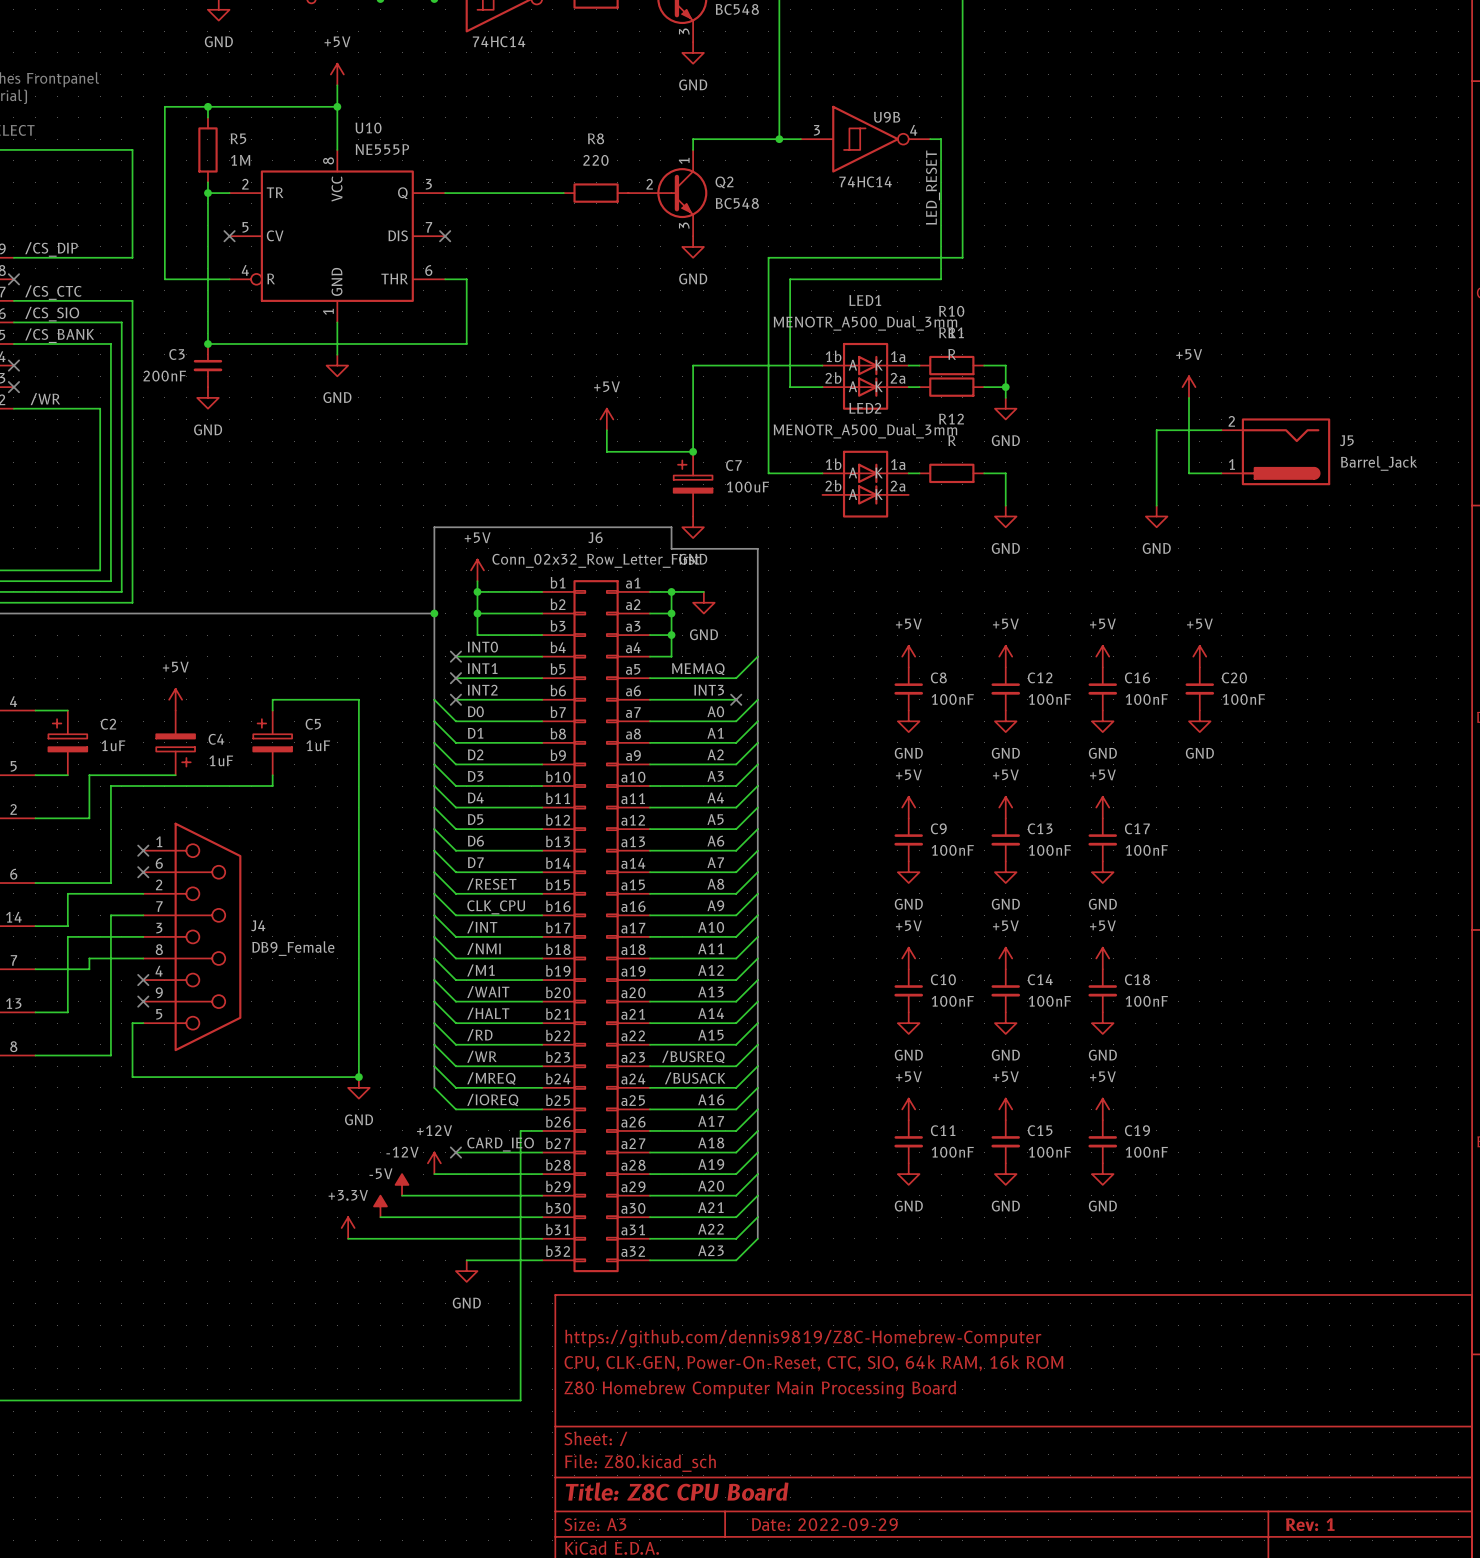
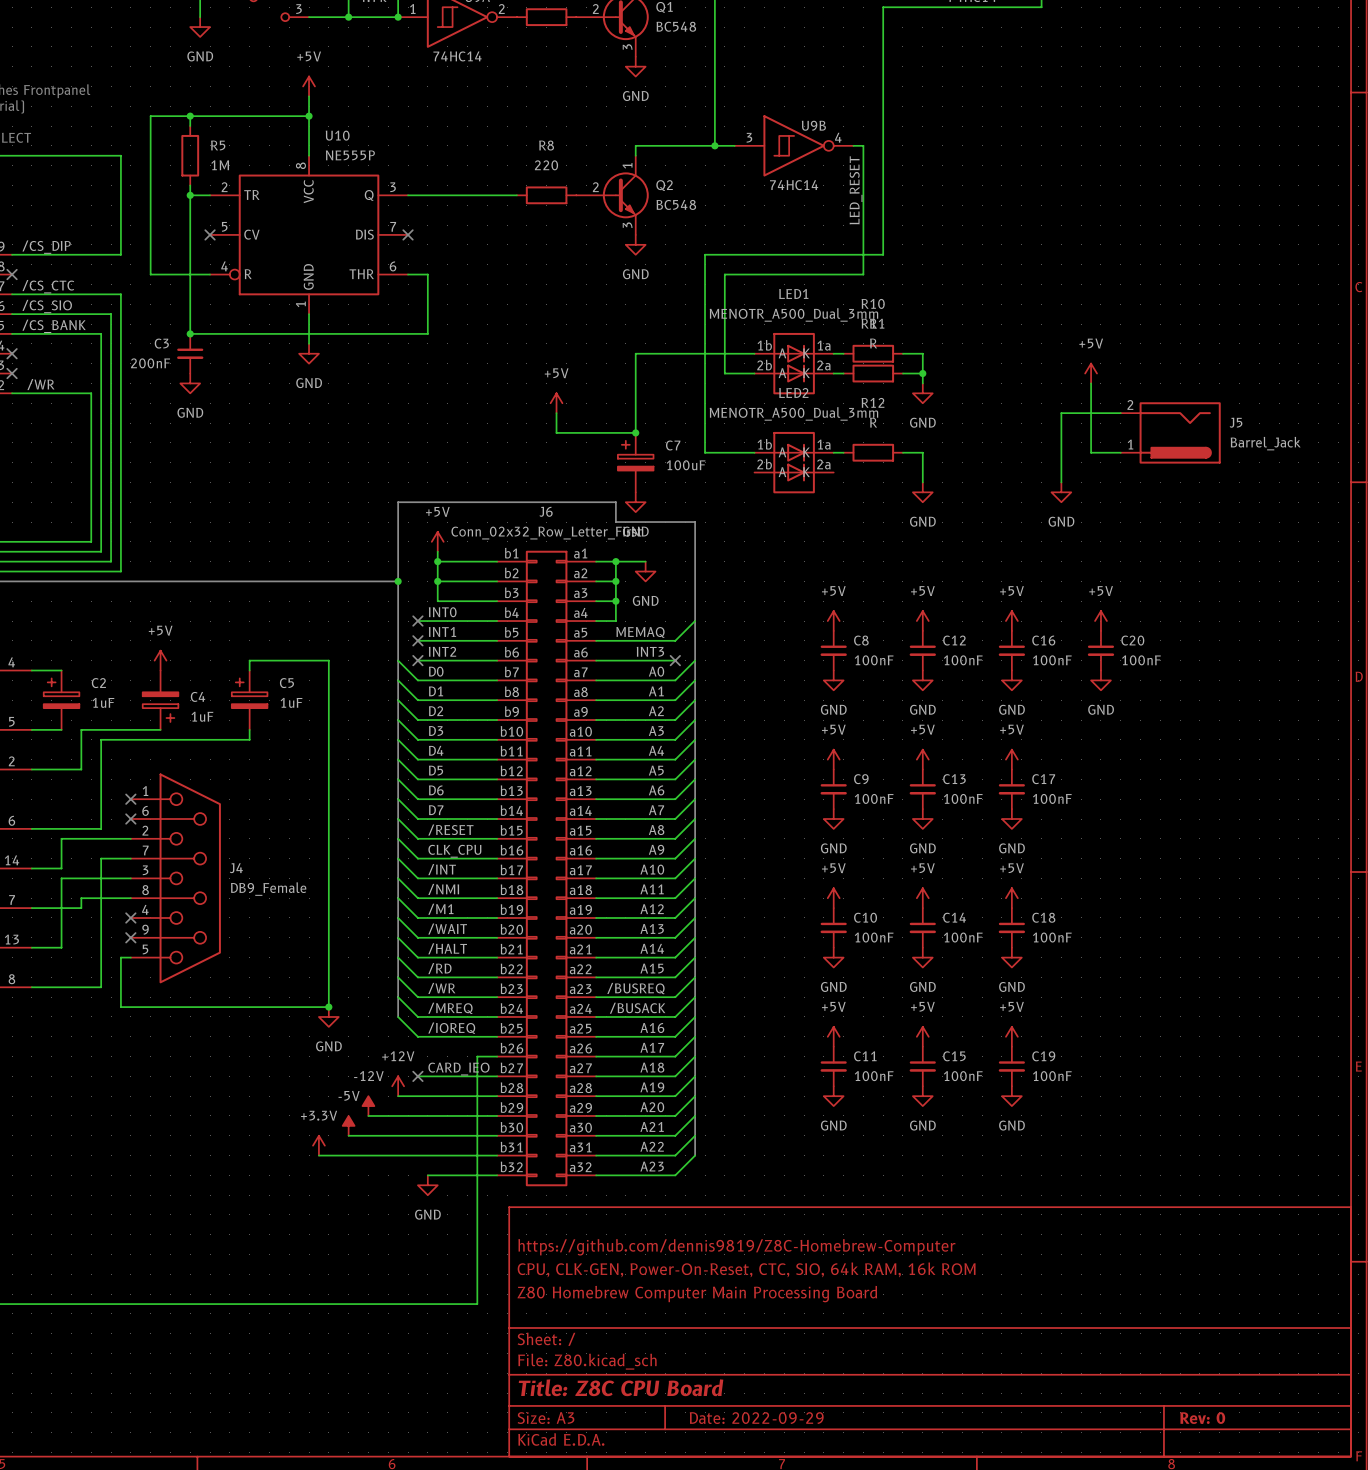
title block: Rev: 1 (1310, 1524) -> Rev: 0 (1202, 1418)

